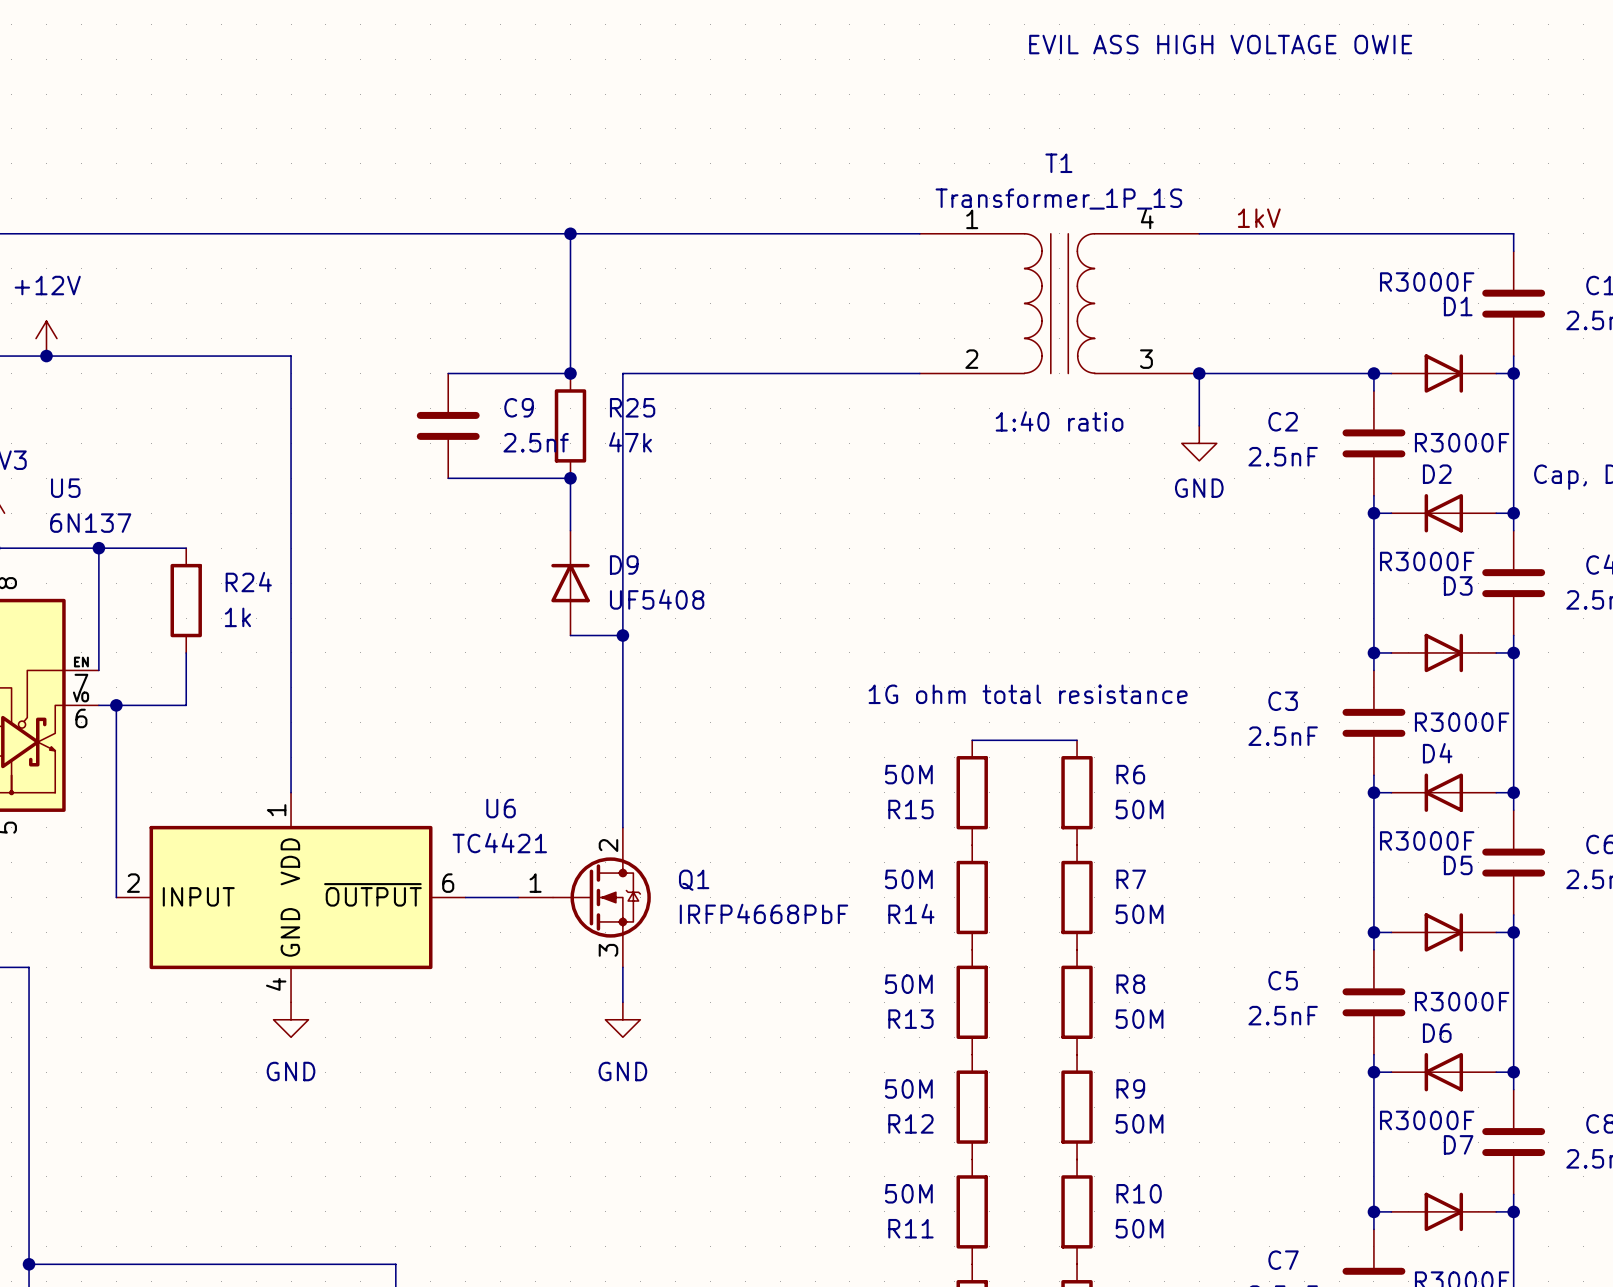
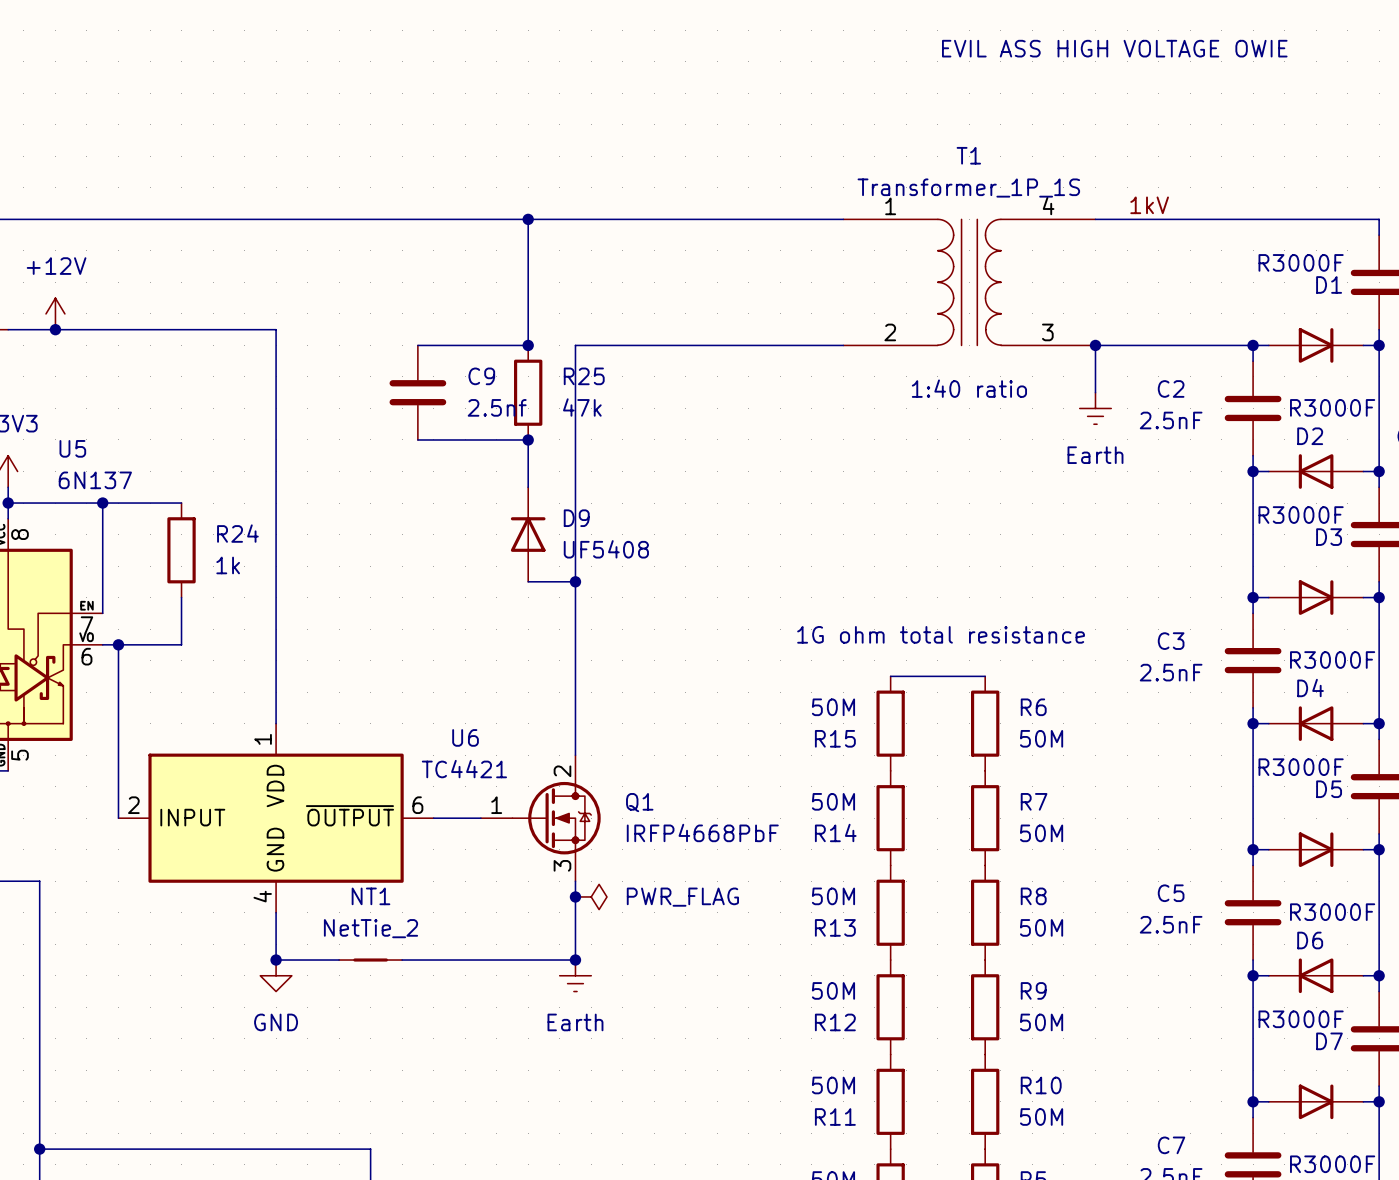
power symbol: GND (1199, 443) -> Earth (1095, 408)
junction: none -> (575, 896)
power symbol: none -> PWR_FLAG (591, 896)
wire: none -> (276, 912) (276, 960) (339, 960)
wire: none -> (575, 912) (575, 960) (402, 960)
power symbol position: GND (291, 1019) -> GND (276, 975)
power symbol: GND (622, 1019) -> none
junction: none -> (276, 960)
NT1: none -> NetTie_2 (370, 960)
junction: none -> (575, 960)
power symbol: none -> Earth (575, 975)

